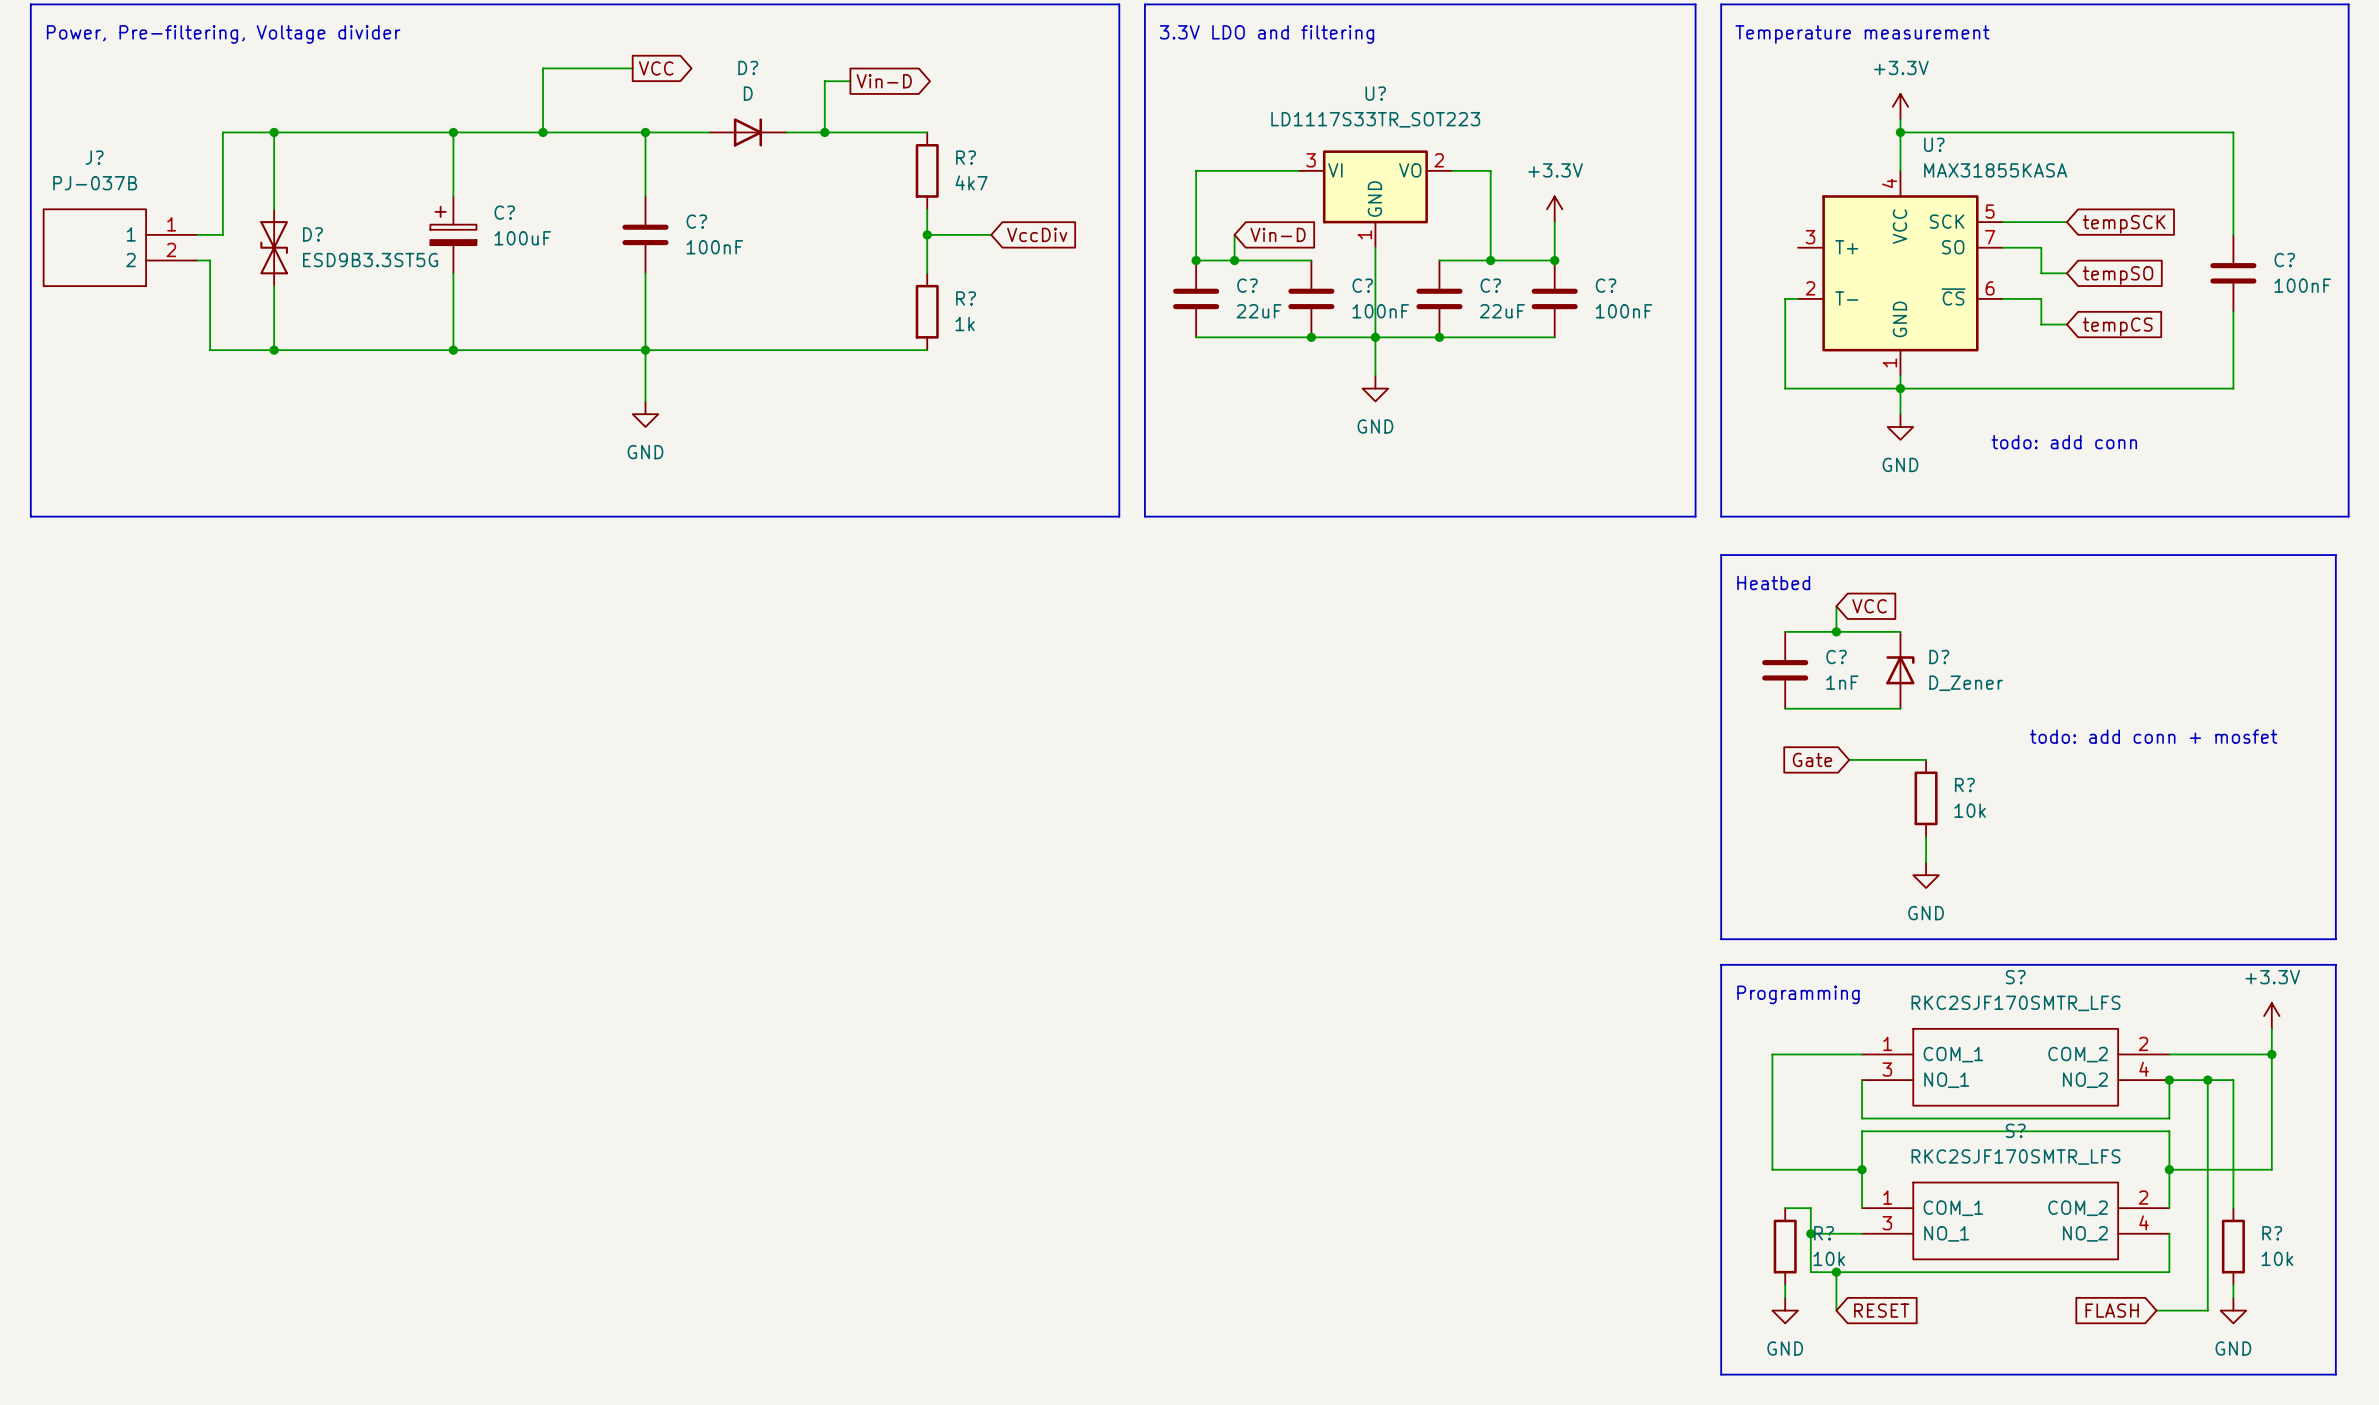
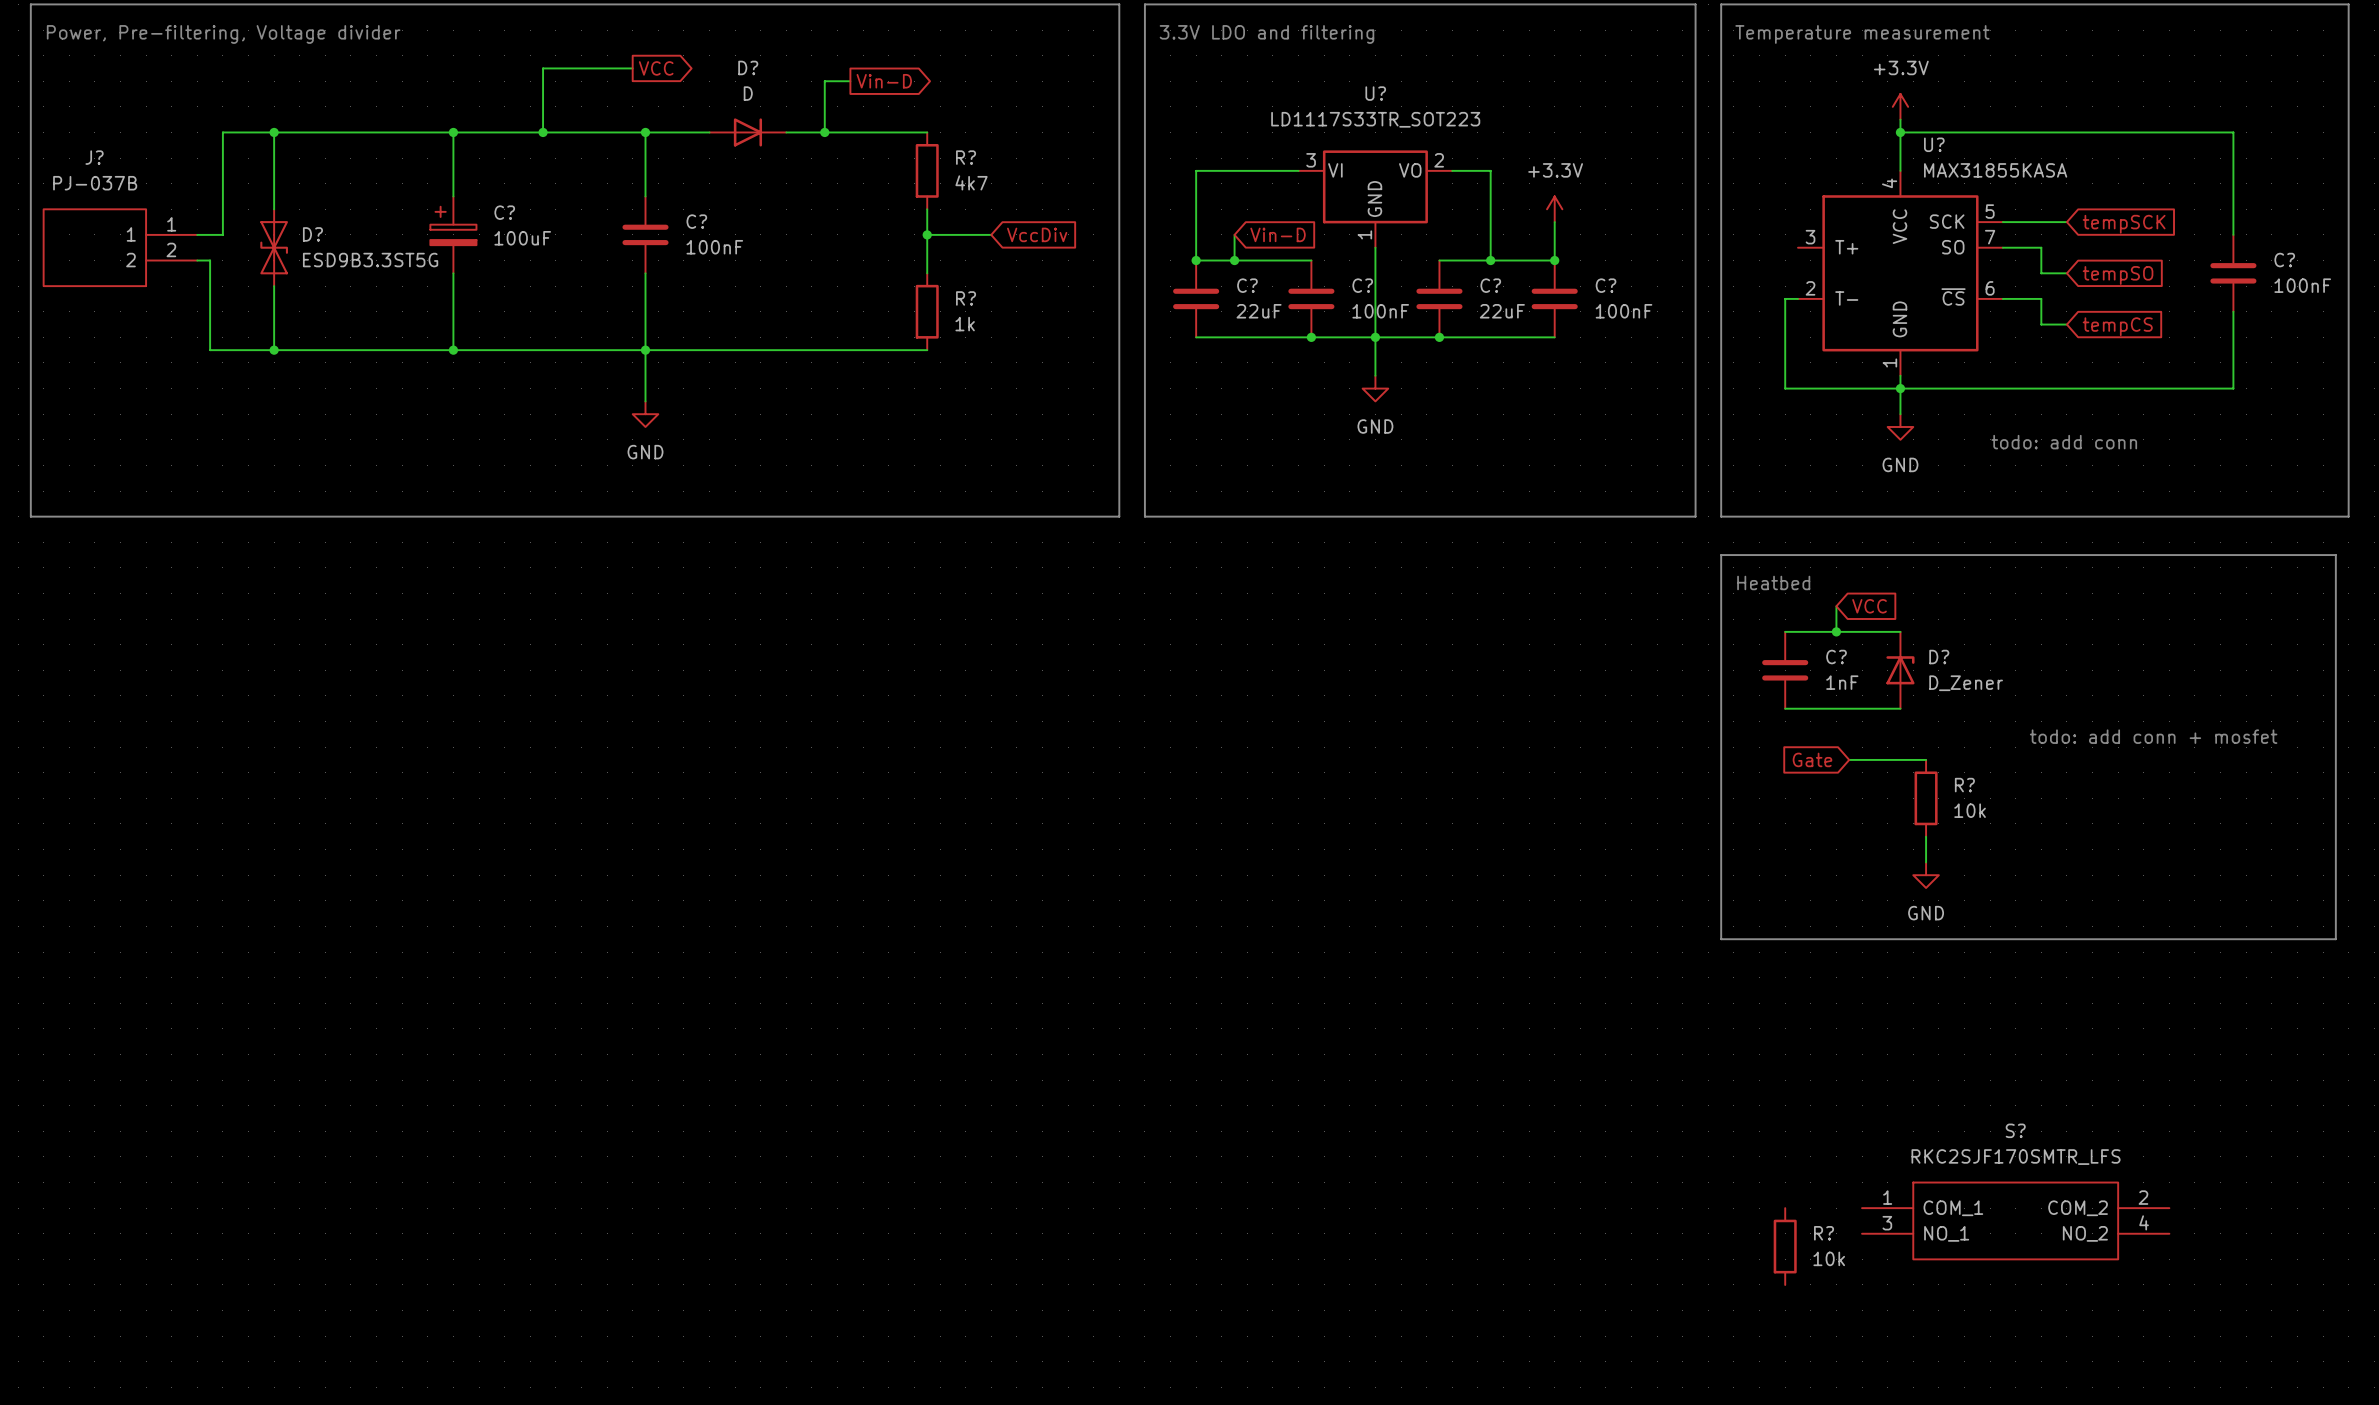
line: (1721, 964) (1721, 1374) (2335, 1374) (2335, 964) (1721, 964) -> none
text: Programming (1798, 994) -> none
power symbol: +3.3V (2271, 1016) -> none
wire: (2271, 1028) (2271, 1169) (2169, 1169) -> none
wire: (1862, 1054) (1772, 1054) (1772, 1169) (1862, 1169) -> none
wire: (2169, 1054) (2271, 1054) -> none
junction: (2271, 1054) -> none
S?: RKC2SJF170SMTR_LFS (2015, 1067) -> none
wire: (1862, 1080) (1862, 1118) (2169, 1118) (2169, 1080) (2233, 1080) (2233, 1208) -> none
junction: (2169, 1080) -> none
wire: (2207, 1080) (2207, 1310) (2156, 1310) -> none
junction: (2207, 1080) -> none
junction: (1862, 1169) -> none
junction: (2169, 1169) -> none
wire: (1785, 1208) (1810, 1208) (1810, 1272) (2169, 1272) (2169, 1233) -> none
wire: (1862, 1208) (1862, 1131) (2169, 1131) (2169, 1208) -> none
wire: (1810, 1233) (1862, 1233) -> none
junction: (1810, 1233) -> none
R?: 10k (2233, 1246) -> none
wire: (1836, 1272) (1836, 1310) -> none
junction: (1836, 1272) -> none
wire: (1785, 1284) (1785, 1297) -> none
wire: (2233, 1284) (2233, 1297) -> none
power symbol: GND (1785, 1310) -> none
global label: RESET (1881, 1310) -> none
global label: FLASH (2112, 1310) -> none
power symbol: GND (2233, 1310) -> none

